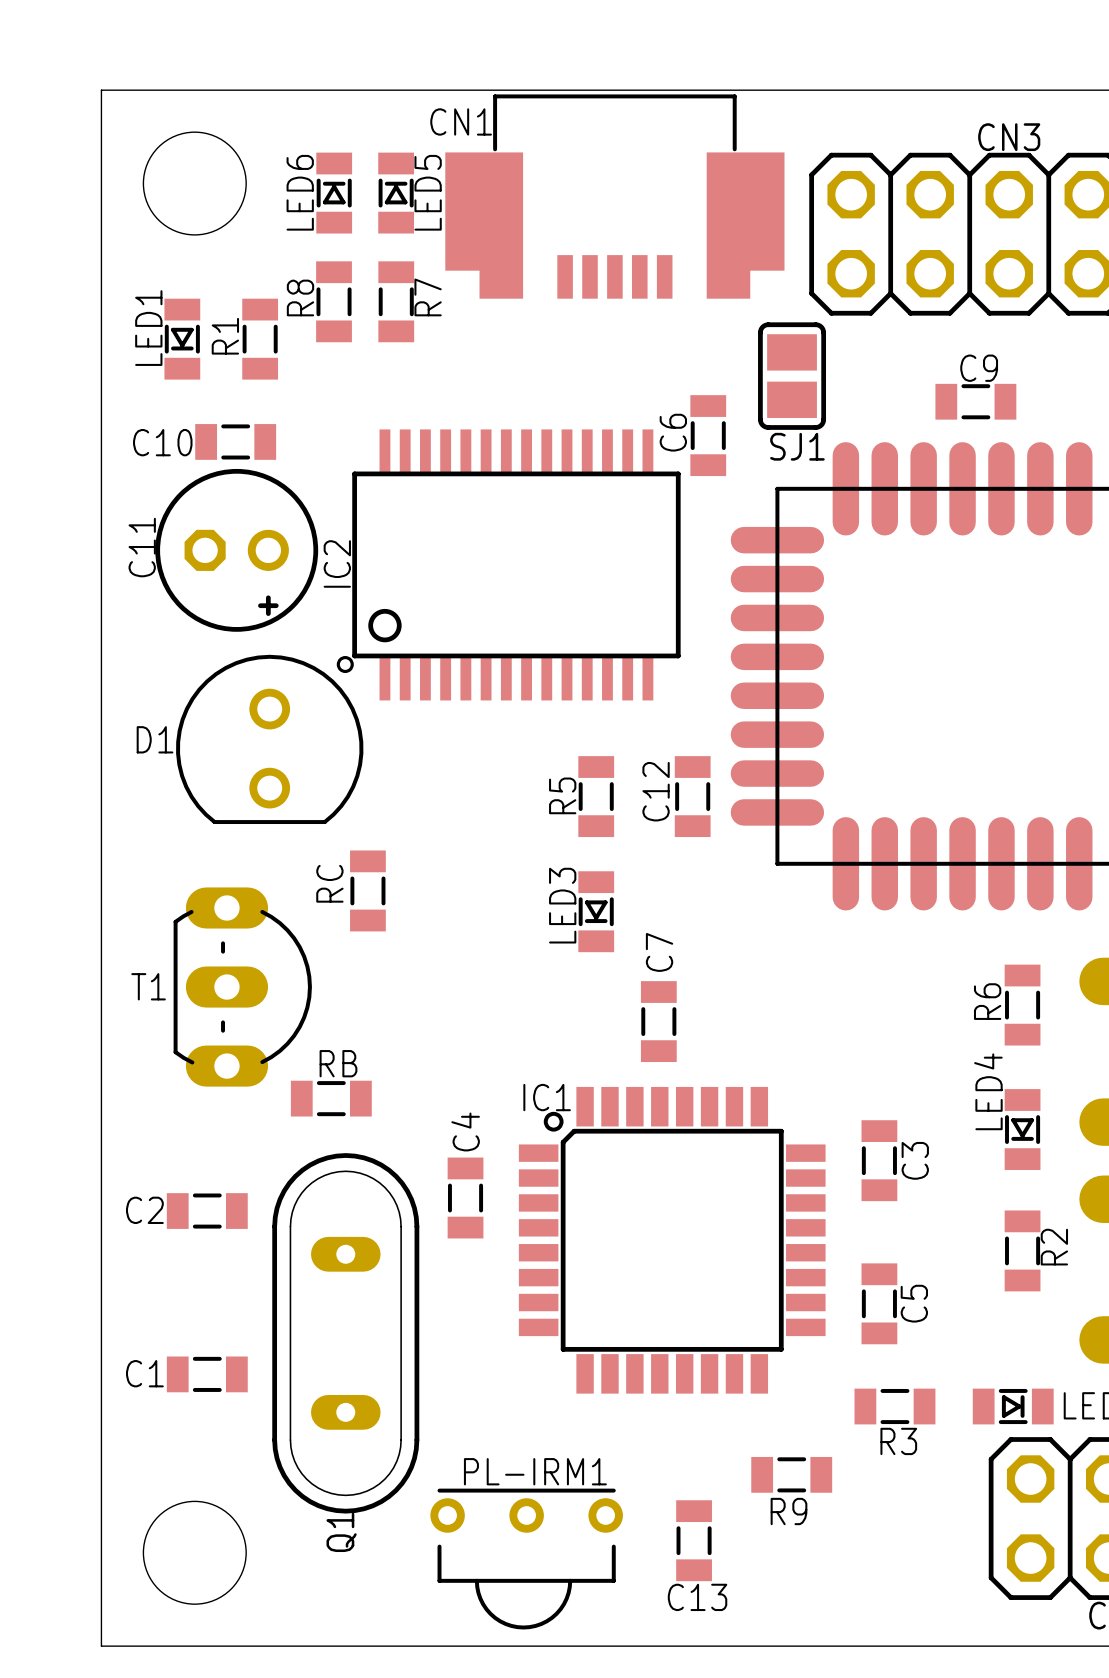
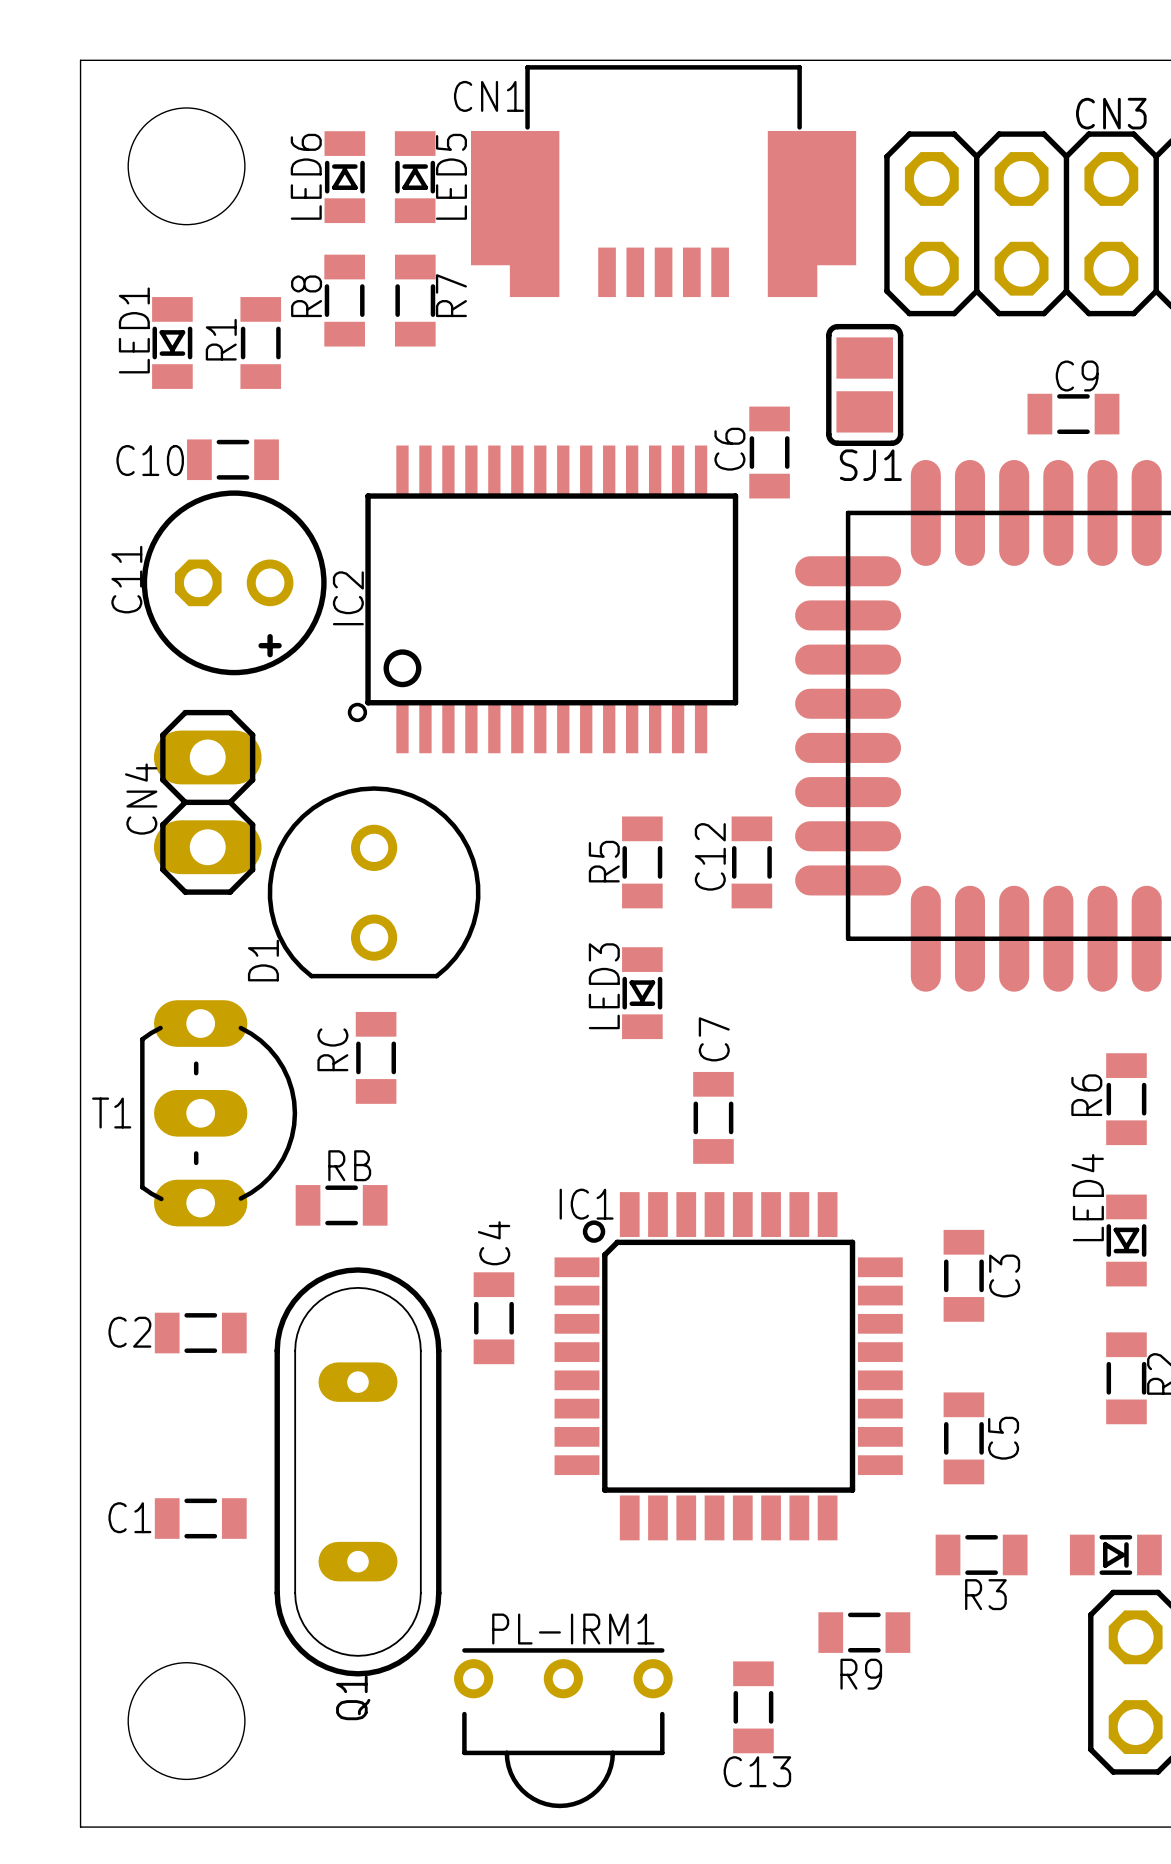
D1 name rotation: 0° (155, 739) -> 90° counterclockwise (263, 960)
D1 name position: D1 (155, 739) -> D1 (263, 960)
D1 position: (269, 739) -> (374, 882)
CN4: none -> (207, 802)
RC position: (367, 890) -> (376, 1057)
T1 position: (242, 987) -> (218, 1113)

